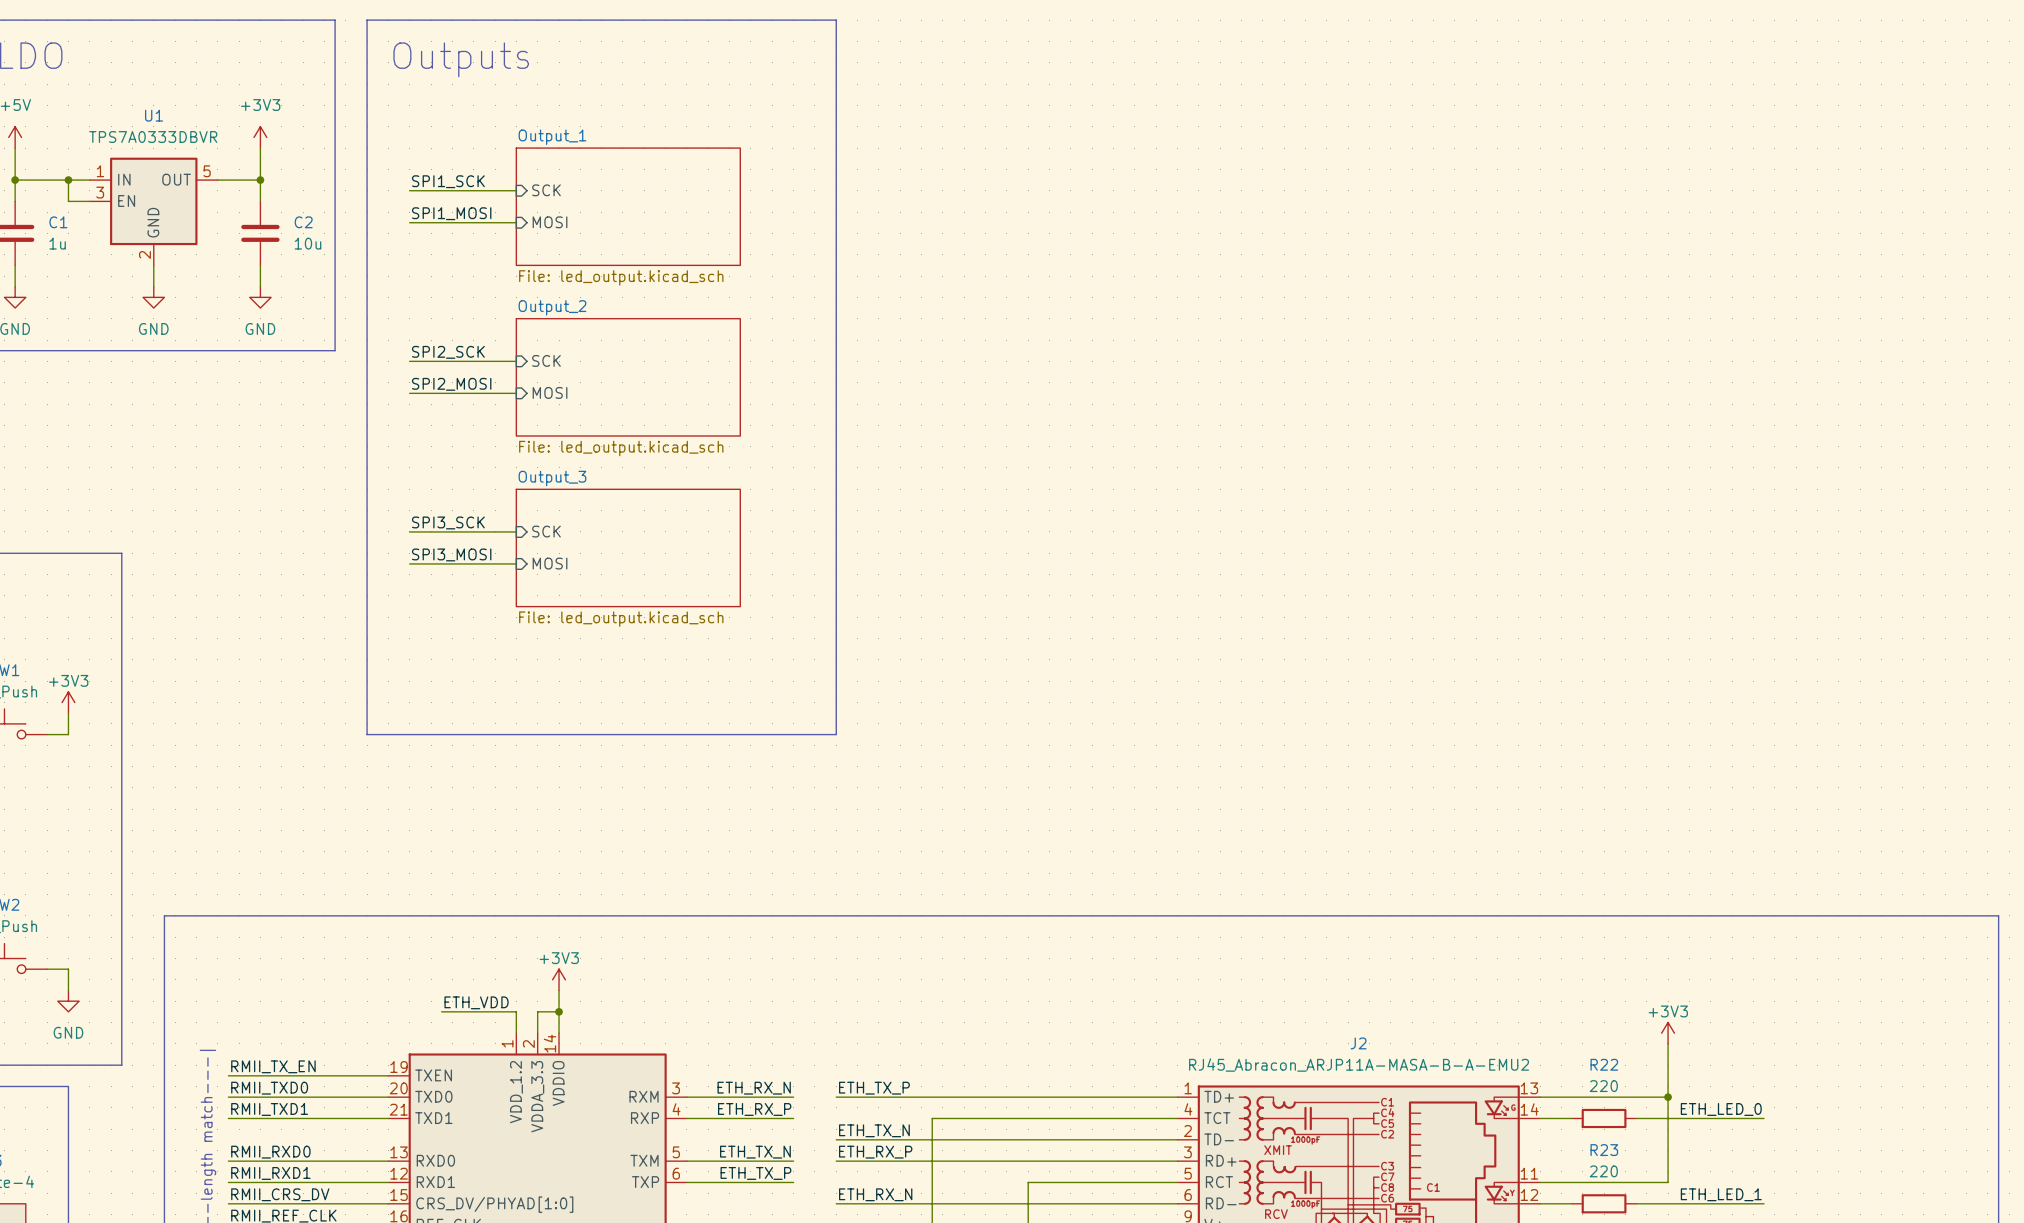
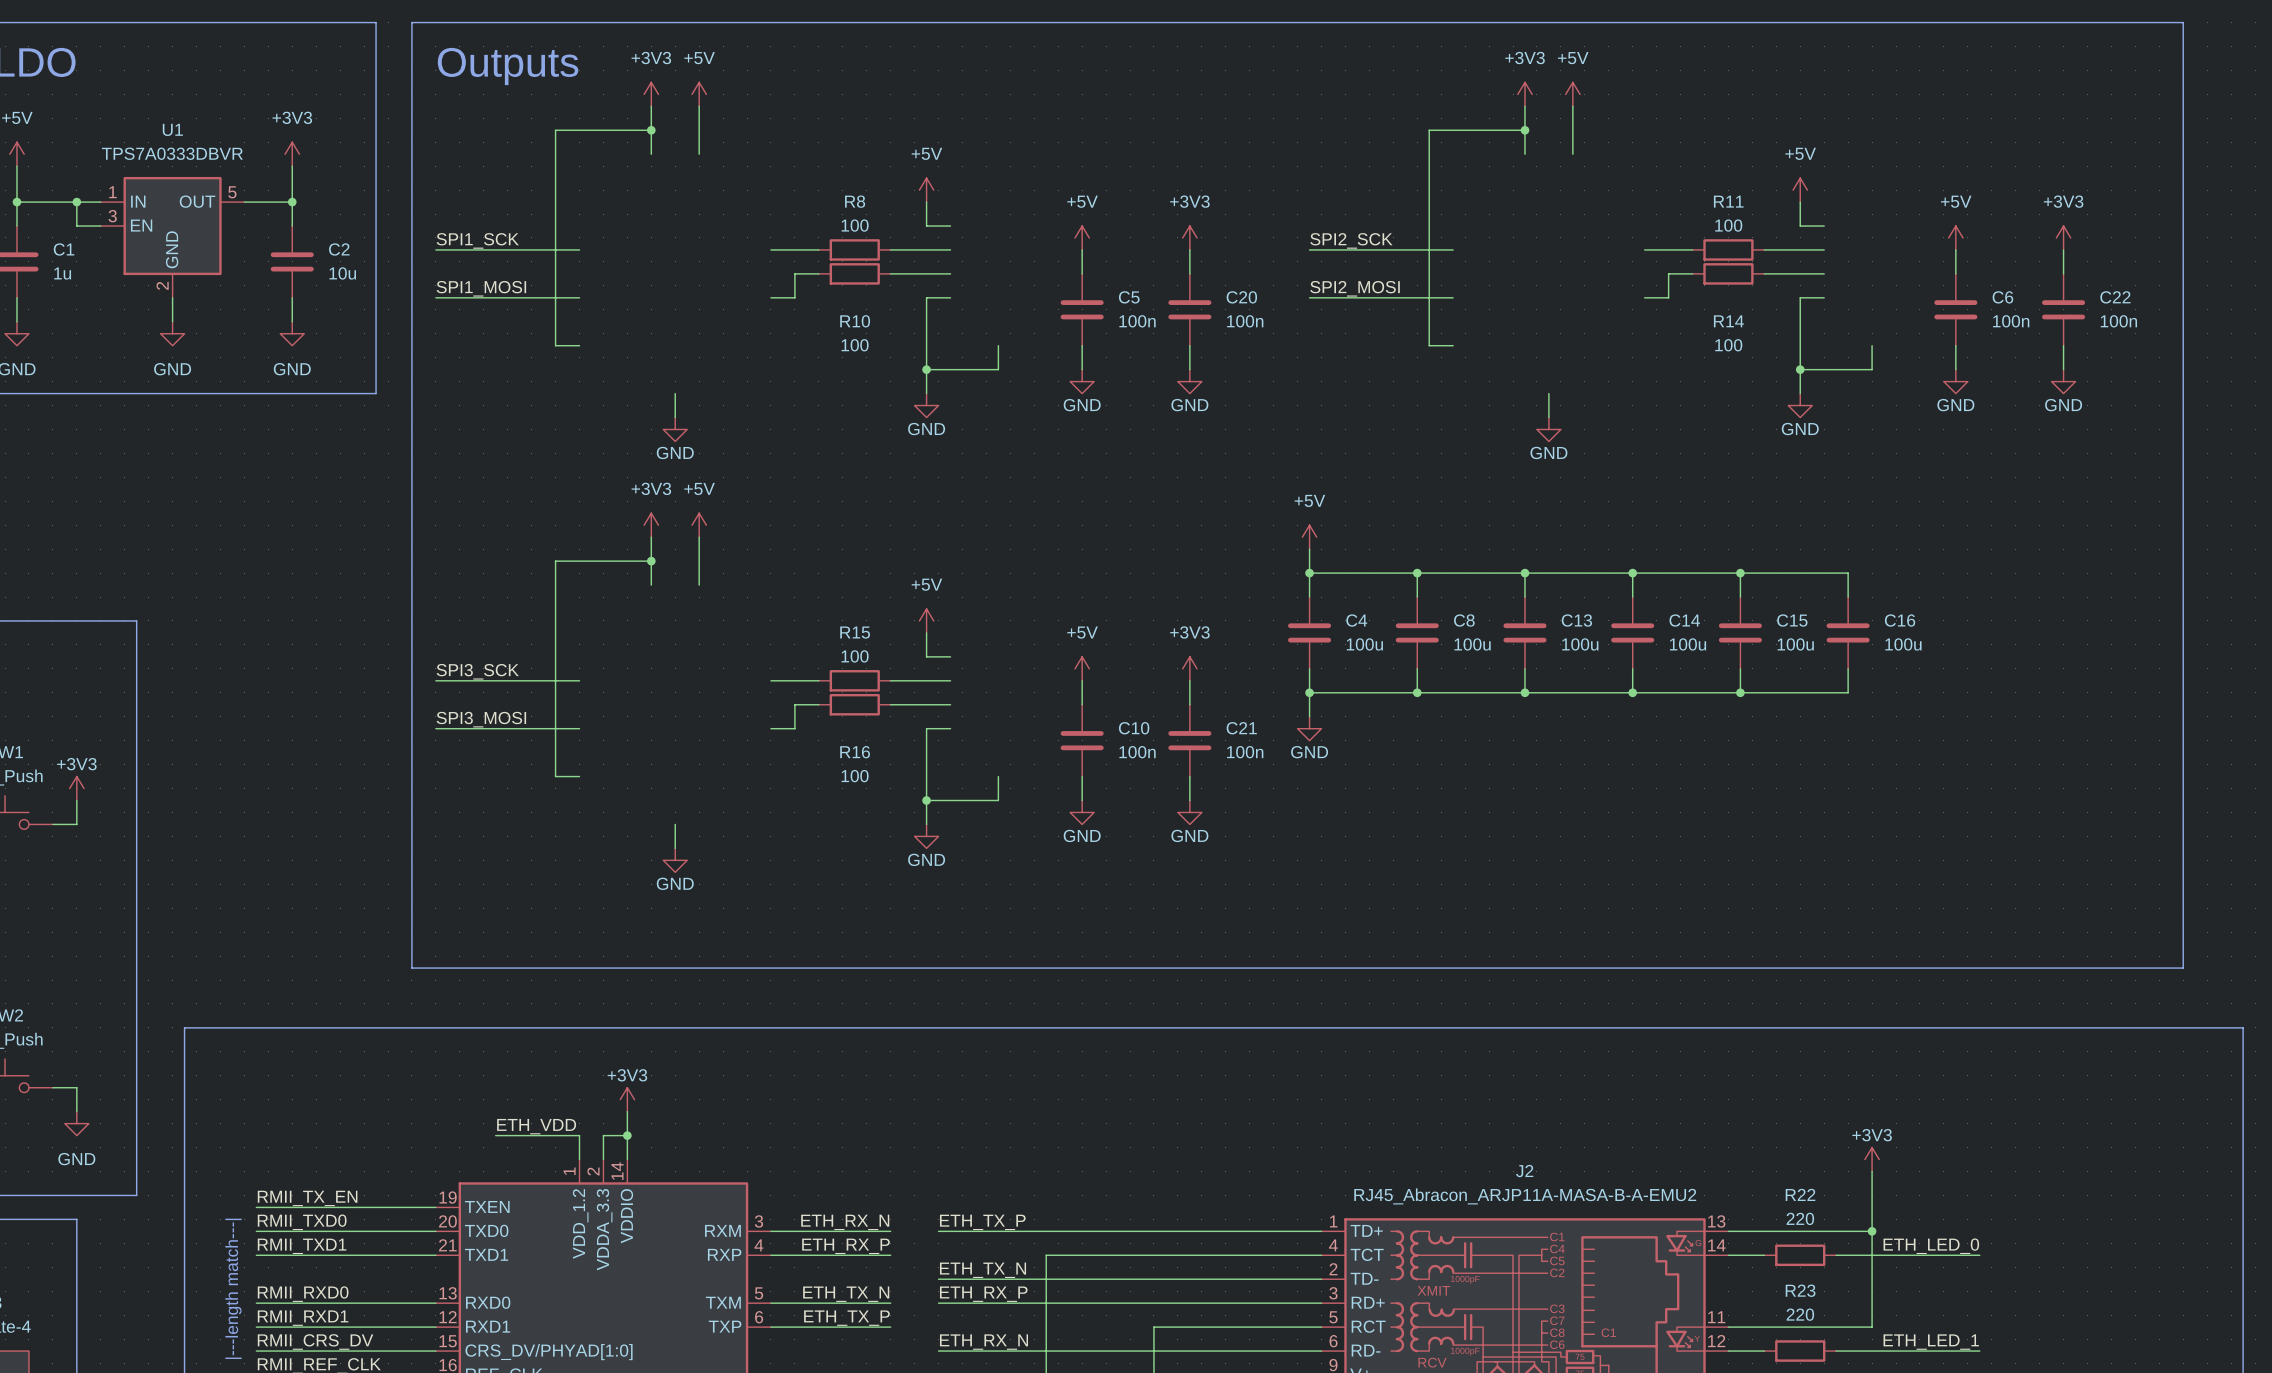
line: (836, 20) (836, 734) (367, 734) -> (938, 22) (2183, 22) (2183, 968) (411, 968) (411, 824)
power symbol: none -> +3V3 (651, 94)
power symbol: none -> +5V (699, 94)
power symbol: none -> +3V3 (1524, 94)
power symbol: none -> +5V (1572, 94)
wire: none -> (651, 106) (651, 154)
wire: none -> (699, 106) (699, 154)
wire: none -> (1524, 106) (1524, 154)
wire: none -> (1572, 106) (1572, 154)
wire: none -> (651, 130) (555, 130) (555, 345) (579, 345)
junction: none -> (651, 130)
wire: none -> (1524, 130) (1429, 130) (1429, 345) (1453, 345)
junction: none -> (1524, 130)
power symbol: none -> +5V (926, 190)
power symbol: none -> +5V (1800, 190)
wire: none -> (926, 202) (926, 226) (950, 226)
wire: none -> (1800, 202) (1800, 226) (1824, 226)
label position: SPI1_SCK (448, 181) -> SPI1_SCK (477, 240)
wire: (409, 190) (516, 190) -> none
sheet pin: SCK (546, 190) -> none
sheet Output_1: File: led_output.kicad_sch (628, 206) -> none
power symbol: none -> +5V (1082, 237)
power symbol: none -> +3V3 (1189, 237)
power symbol: none -> +5V (1955, 237)
power symbol: none -> +3V3 (2063, 237)
label position: SPI1_MOSI (451, 213) -> SPI1_MOSI (481, 288)
label: none -> SPI2_SCK (1351, 240)
wire: none -> (435, 249) (459, 249)
sheet pin: MOSI (550, 222) -> none
wire: none -> (770, 249) (818, 249)
R8: none -> 100 (854, 249)
wire: none -> (890, 249) (950, 249)
wire: none -> (1082, 249) (1082, 273)
wire: none -> (1189, 249) (1189, 273)
wire: none -> (1309, 249) (1453, 249)
wire: none -> (1644, 249) (1692, 249)
R11: none -> 100 (1728, 249)
wire: none -> (1764, 249) (1824, 249)
wire: none -> (1955, 249) (1955, 273)
wire: none -> (2063, 249) (2063, 273)
wire: none -> (818, 273) (794, 273) (794, 297) (770, 297)
R10: none -> 100 (854, 273)
wire: none -> (890, 273) (950, 273)
wire: none -> (1692, 273) (1668, 273) (1668, 297) (1644, 297)
R14: none -> 100 (1728, 273)
wire: none -> (1764, 273) (1824, 273)
label: none -> SPI2_MOSI (1355, 288)
wire: none -> (435, 297) (579, 297)
wire: none -> (950, 297) (926, 297) (926, 393)
wire: none -> (1309, 297) (1453, 297)
wire: none -> (1824, 297) (1800, 297) (1800, 393)
C5: none -> 100n (1082, 309)
C20: none -> 100n (1189, 309)
C6: none -> 100n (1955, 309)
C22: none -> 100n (2063, 309)
wire: none -> (998, 345) (998, 369) (926, 369)
wire: none -> (1082, 345) (1082, 369)
wire: none -> (1189, 345) (1189, 369)
wire: none -> (1872, 345) (1872, 369) (1800, 369)
wire: none -> (1955, 345) (1955, 369)
wire: none -> (2063, 345) (2063, 369)
junction: none -> (926, 369)
junction: none -> (1800, 369)
power symbol: none -> GND (1082, 381)
power symbol: none -> GND (1189, 381)
power symbol: none -> GND (1955, 381)
power symbol: none -> GND (2063, 381)
wire: none -> (675, 393) (675, 417)
wire: none -> (1548, 393) (1548, 417)
label: SPI2_SCK (448, 352) -> none
sheet pin: SCK (546, 360) -> none
wire: (409, 361) (516, 361) -> none
power symbol: none -> GND (926, 405)
power symbol: none -> GND (1800, 405)
sheet Output_2: File: led_output.kicad_sch (628, 377) -> none
power symbol: none -> GND (675, 429)
power symbol: none -> GND (1548, 429)
label: SPI2_MOSI (451, 384) -> none
sheet pin: MOSI (550, 392) -> none
wire: (409, 393) (516, 393) -> none
power symbol: none -> +3V3 (651, 525)
power symbol: none -> +5V (699, 525)
wire: none -> (651, 537) (651, 585)
wire: none -> (699, 537) (699, 585)
power symbol: none -> +5V (1309, 537)
wire: none -> (1309, 549) (1309, 597)
wire: none -> (651, 561) (555, 561) (555, 776) (579, 776)
junction: none -> (651, 561)
wire: none -> (1309, 573) (1848, 573) (1848, 597)
junction: none -> (1309, 573)
wire: none -> (1417, 573) (1417, 597)
junction: none -> (1417, 573)
wire: none -> (1524, 573) (1524, 597)
junction: none -> (1524, 573)
wire: none -> (1632, 573) (1632, 597)
junction: none -> (1632, 573)
wire: none -> (1740, 573) (1740, 597)
junction: none -> (1740, 573)
label position: SPI3_SCK (448, 522) -> SPI3_SCK (477, 671)
wire: (409, 531) (516, 531) -> none
sheet pin: SCK (546, 531) -> none
sheet Output_3: File: led_output.kicad_sch (628, 547) -> none
power symbol: none -> +5V (926, 620)
label position: SPI3_MOSI (451, 554) -> SPI3_MOSI (481, 719)
wire: (409, 563) (516, 563) -> none
sheet pin: MOSI (550, 563) -> none
wire: none -> (926, 632) (926, 656) (950, 656)
C4: none -> 100u (1309, 632)
C8: none -> 100u (1417, 632)
C13: none -> 100u (1524, 632)
C14: none -> 100u (1632, 632)
C15: none -> 100u (1740, 632)
C16: none -> 100u (1848, 632)
power symbol: none -> +5V (1082, 668)
power symbol: none -> +3V3 (1189, 668)
wire: none -> (1309, 668) (1309, 716)
wire: none -> (1417, 668) (1417, 692)
wire: none -> (1524, 668) (1524, 692)
wire: none -> (1632, 668) (1632, 692)
wire: none -> (1740, 668) (1740, 692)
wire: none -> (1848, 668) (1848, 692) (1309, 692)
wire: none -> (435, 680) (579, 680)
R15: none -> 100 (854, 680)
wire: none -> (890, 680) (950, 680)
wire: none -> (1082, 680) (1082, 704)
wire: none -> (1189, 680) (1189, 704)
junction: none -> (1309, 692)
junction: none -> (1417, 692)
junction: none -> (1524, 692)
junction: none -> (1632, 692)
junction: none -> (1740, 692)
wire: none -> (818, 704) (794, 704) (794, 728) (770, 728)
R16: none -> 100 (854, 704)
wire: none -> (890, 704) (950, 704)
wire: none -> (435, 728) (579, 728)
wire: none -> (950, 728) (926, 728) (926, 824)
power symbol: none -> GND (1309, 728)
C10: none -> 100n (1082, 740)
C21: none -> 100n (1189, 740)
wire: none -> (998, 776) (998, 800) (926, 800)
wire: none -> (1082, 776) (1082, 800)
wire: none -> (1189, 776) (1189, 800)
junction: none -> (926, 800)
power symbol: none -> GND (1082, 812)
power symbol: none -> GND (1189, 812)
wire: none -> (675, 824) (675, 848)
power symbol: none -> GND (926, 836)
power symbol: none -> GND (675, 860)

